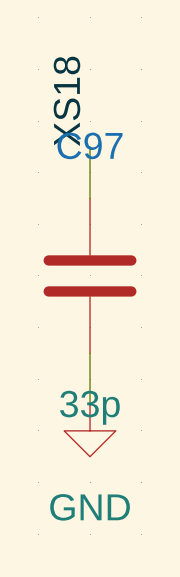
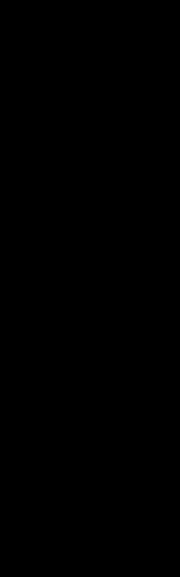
label: XS18 (66, 101) -> none
wire: (90, 146) (90, 198) -> none
C97: 33p (90, 275) -> none
wire: (90, 353) (90, 405) -> none
power symbol: GND (90, 430) -> none

